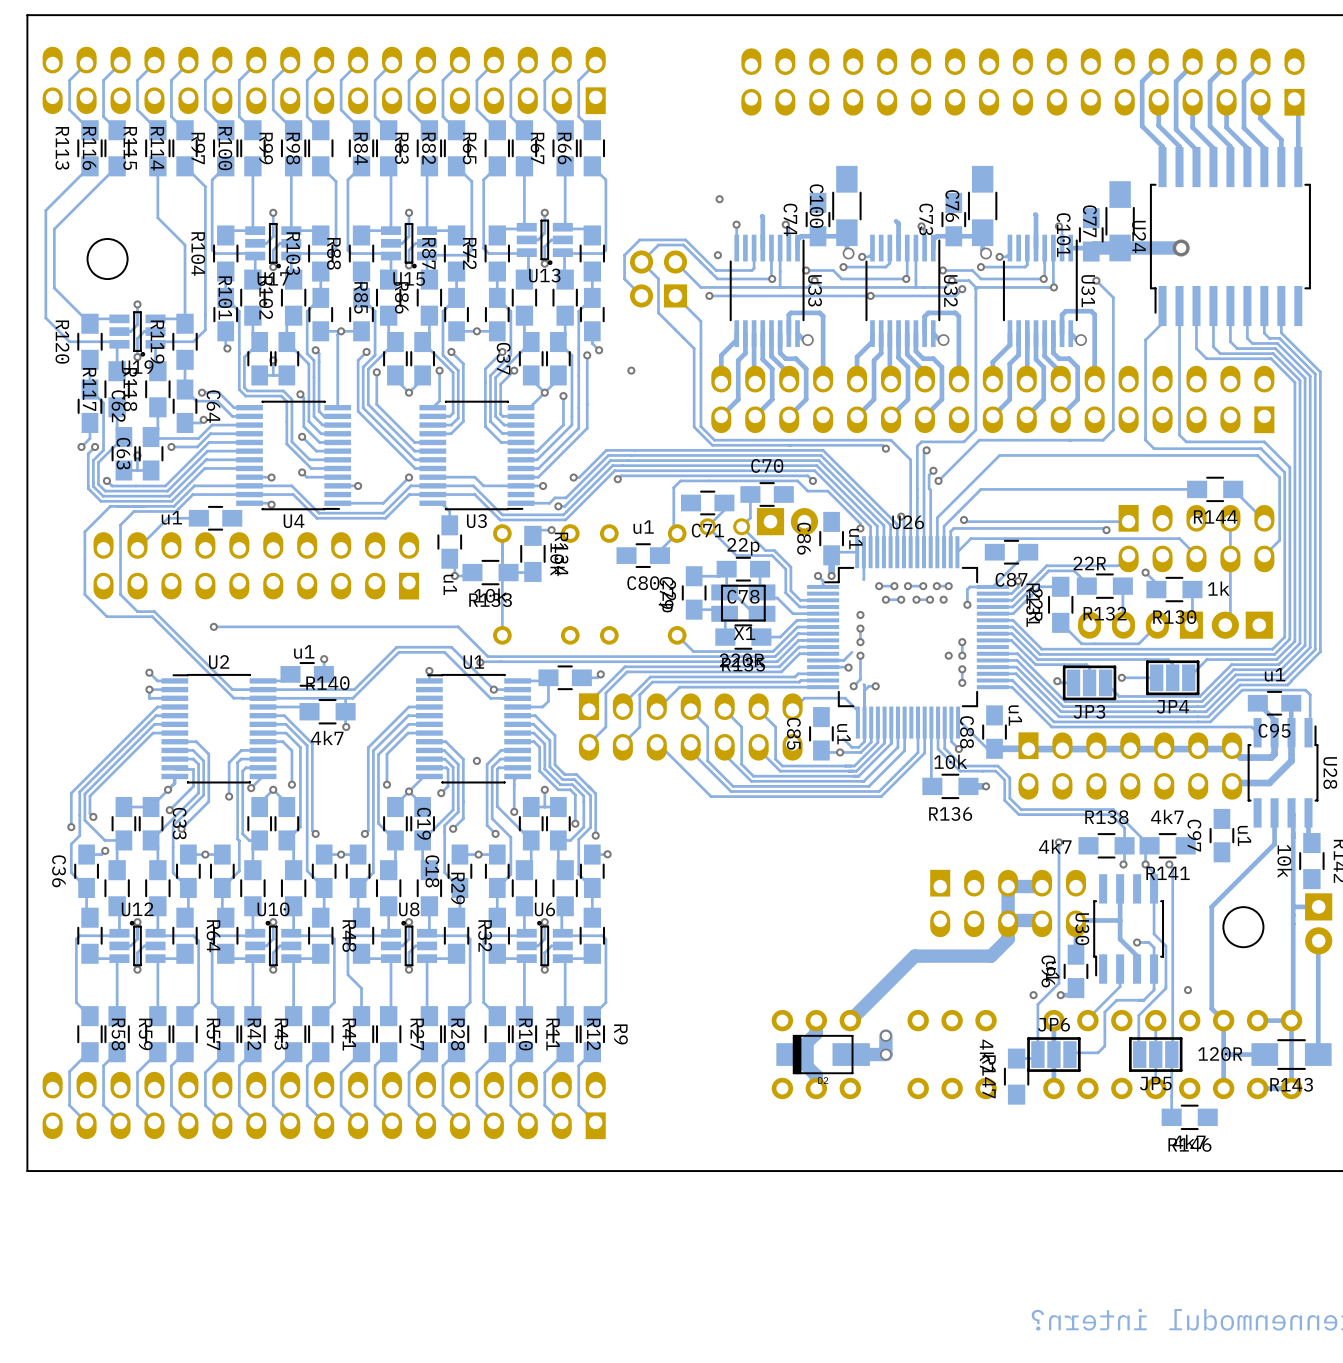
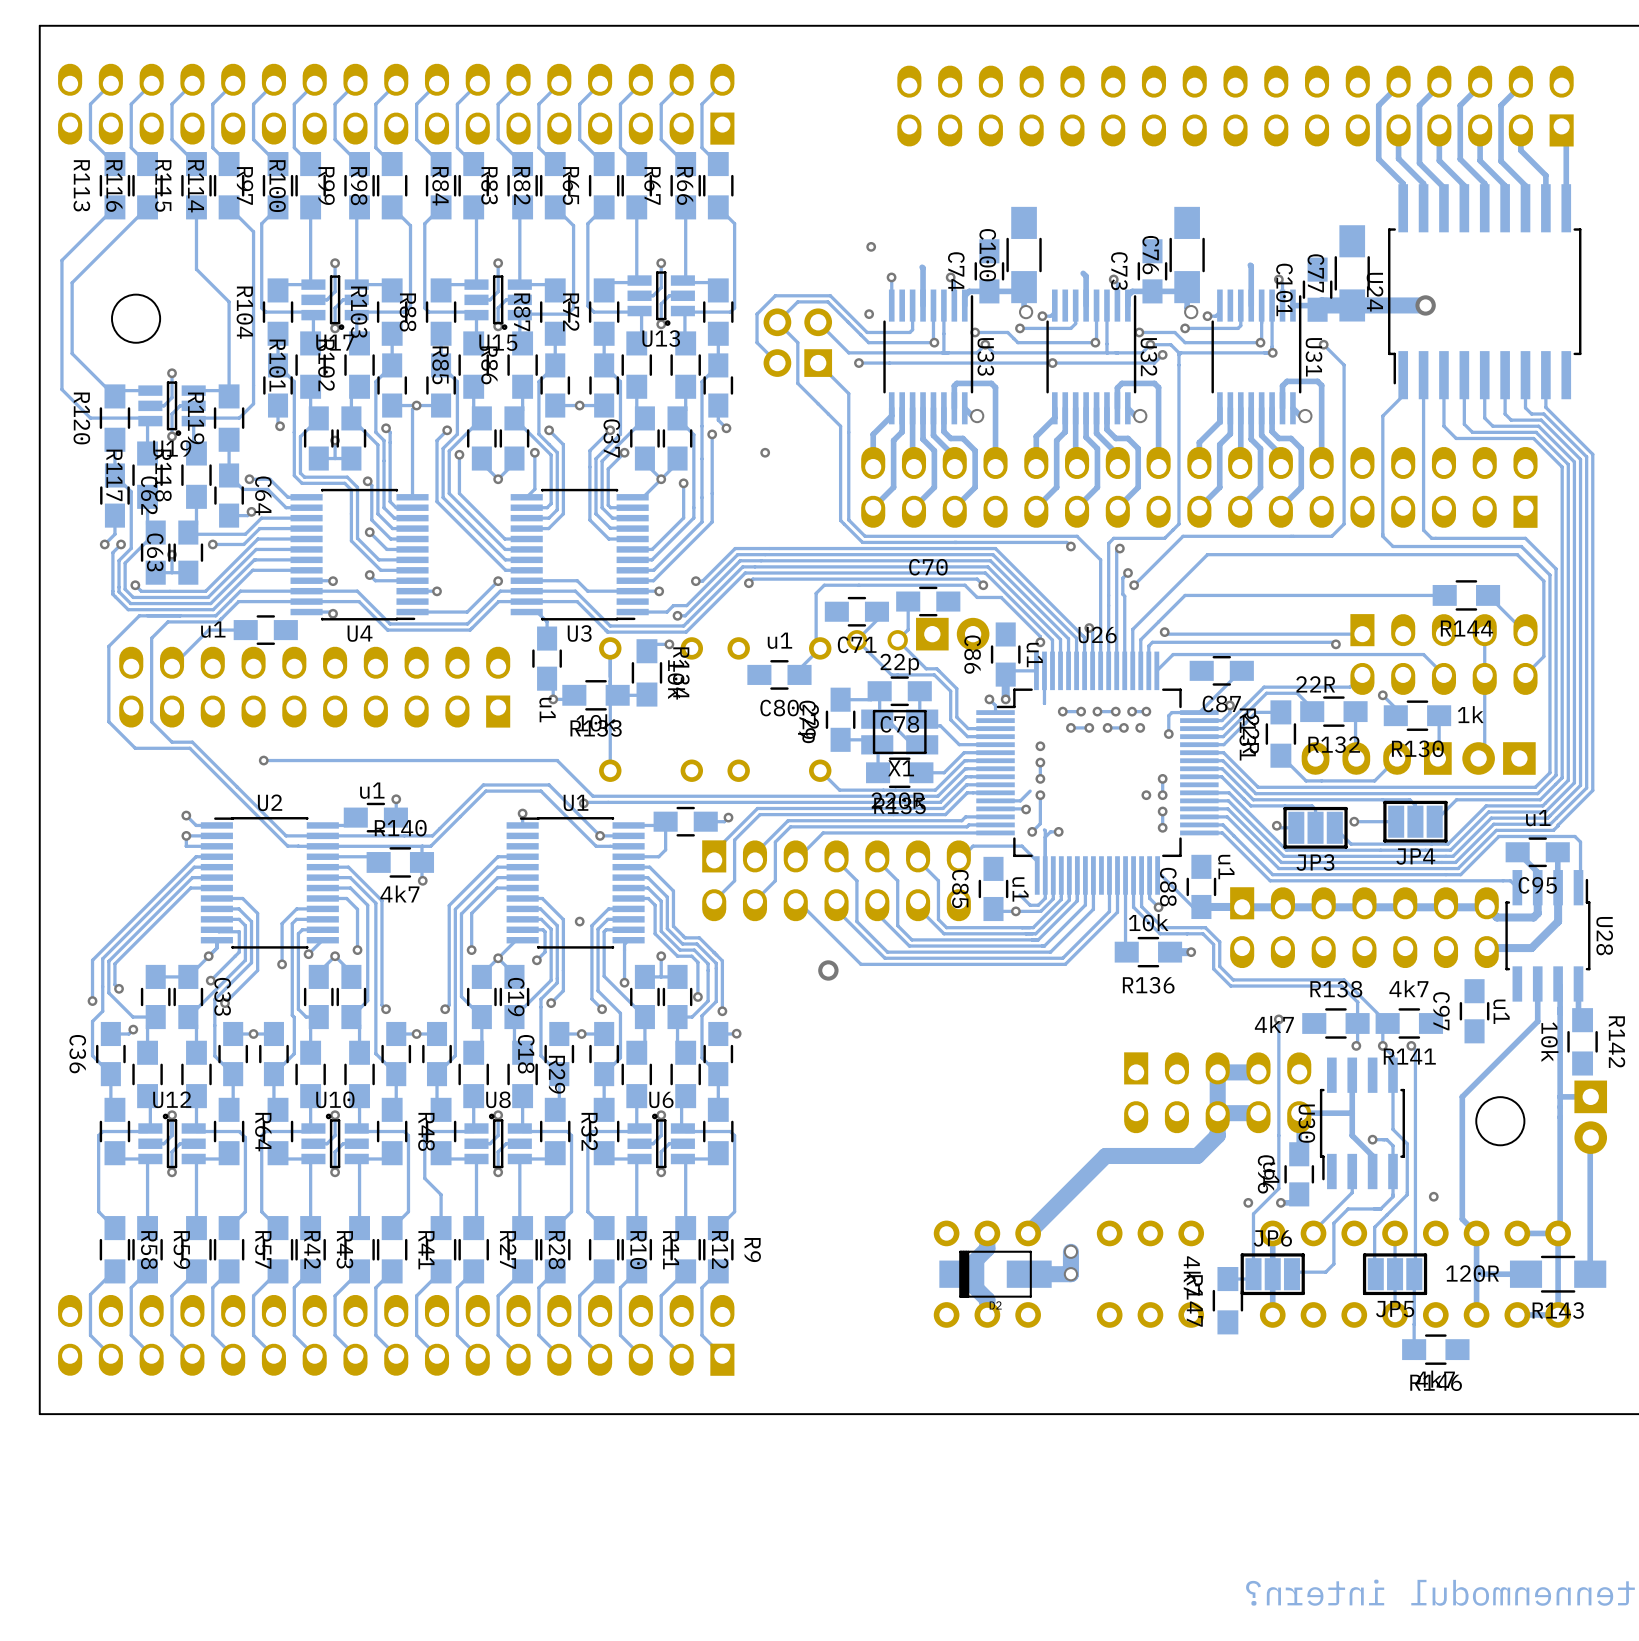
via: none -> (828, 970)

